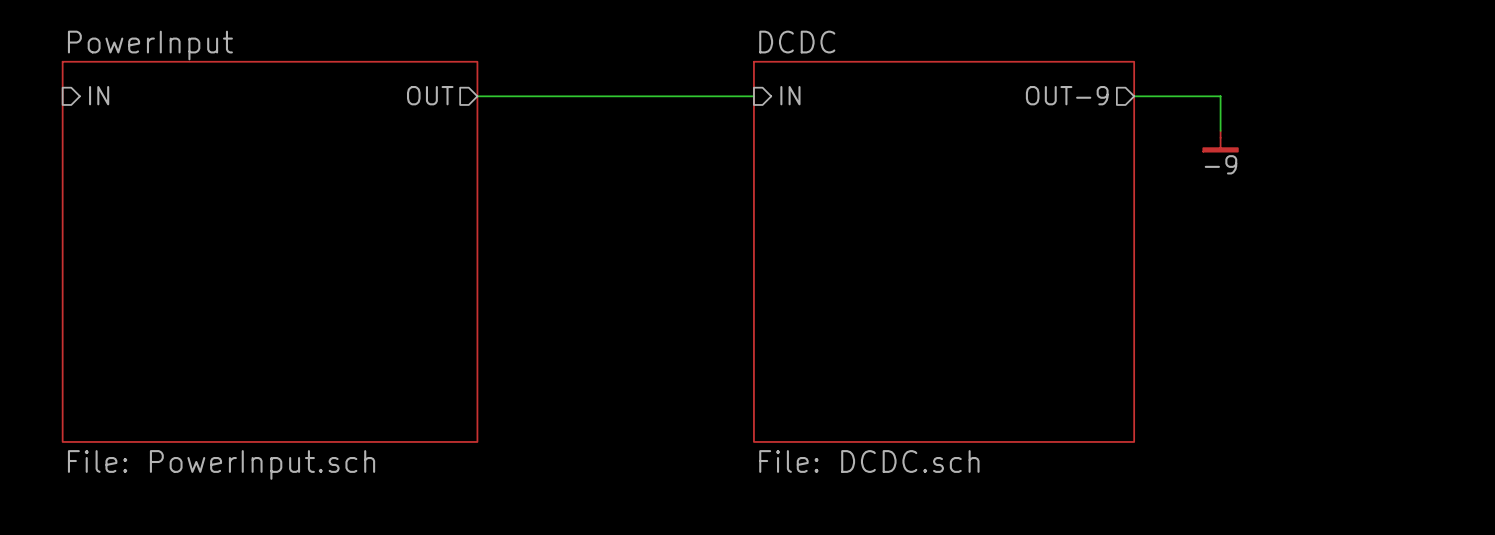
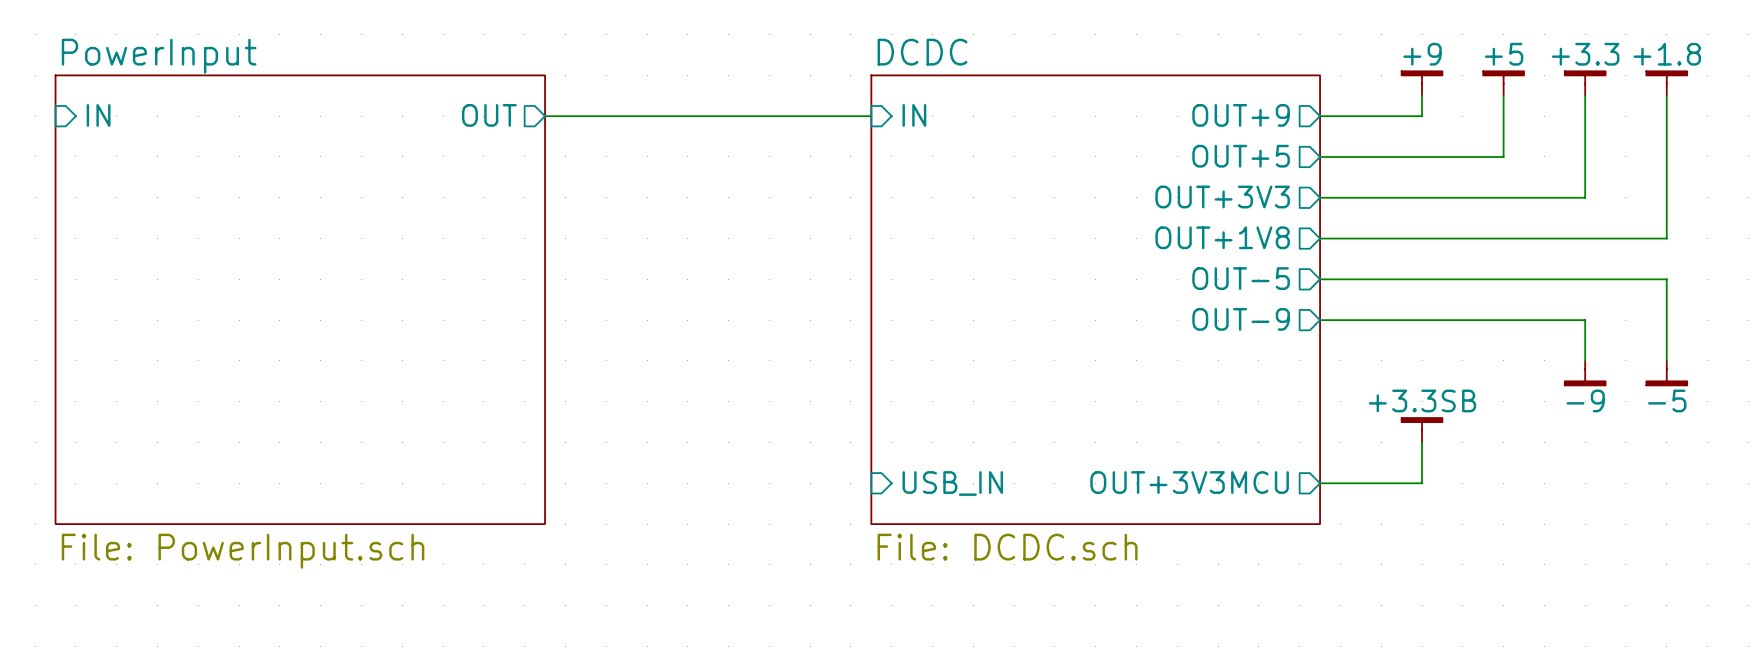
power symbol: none -> +9 (1422, 83)
power symbol: none -> +5 (1503, 83)
power symbol: none -> +3.3 (1585, 83)
power symbol: none -> +1.8 (1666, 83)
wire: none -> (1503, 95) (1503, 156) (1320, 156)
wire: none -> (1585, 95) (1585, 197) (1320, 197)
wire: none -> (1666, 95) (1666, 238) (1320, 238)
sheet pin: OUT-9 (1067, 95) -> OUT+9 (1241, 115)
wire: (1220, 96) (1220, 130) -> (1422, 116) (1422, 95)
sheet pin: none -> OUT+5 (1241, 156)
power symbol position: -9 (1220, 141) -> -9 (1585, 373)
sheet pin: none -> OUT+3V3 (1222, 197)
sheet pin: none -> OUT+1V8 (1222, 237)
sheet pin: none -> OUT-5 (1241, 278)
wire: none -> (1320, 279) (1666, 279) (1666, 360)
sheet pin: none -> OUT-9 (1241, 319)
wire: none -> (1320, 320) (1585, 320) (1585, 360)
power symbol: none -> -5 (1666, 373)
power symbol: none -> +3.3SB (1422, 430)
wire: none -> (1422, 442) (1422, 483) (1320, 483)
sheet pin: none -> OUT+3V3MCU (1189, 482)
sheet pin: none -> USB_IN (952, 483)

